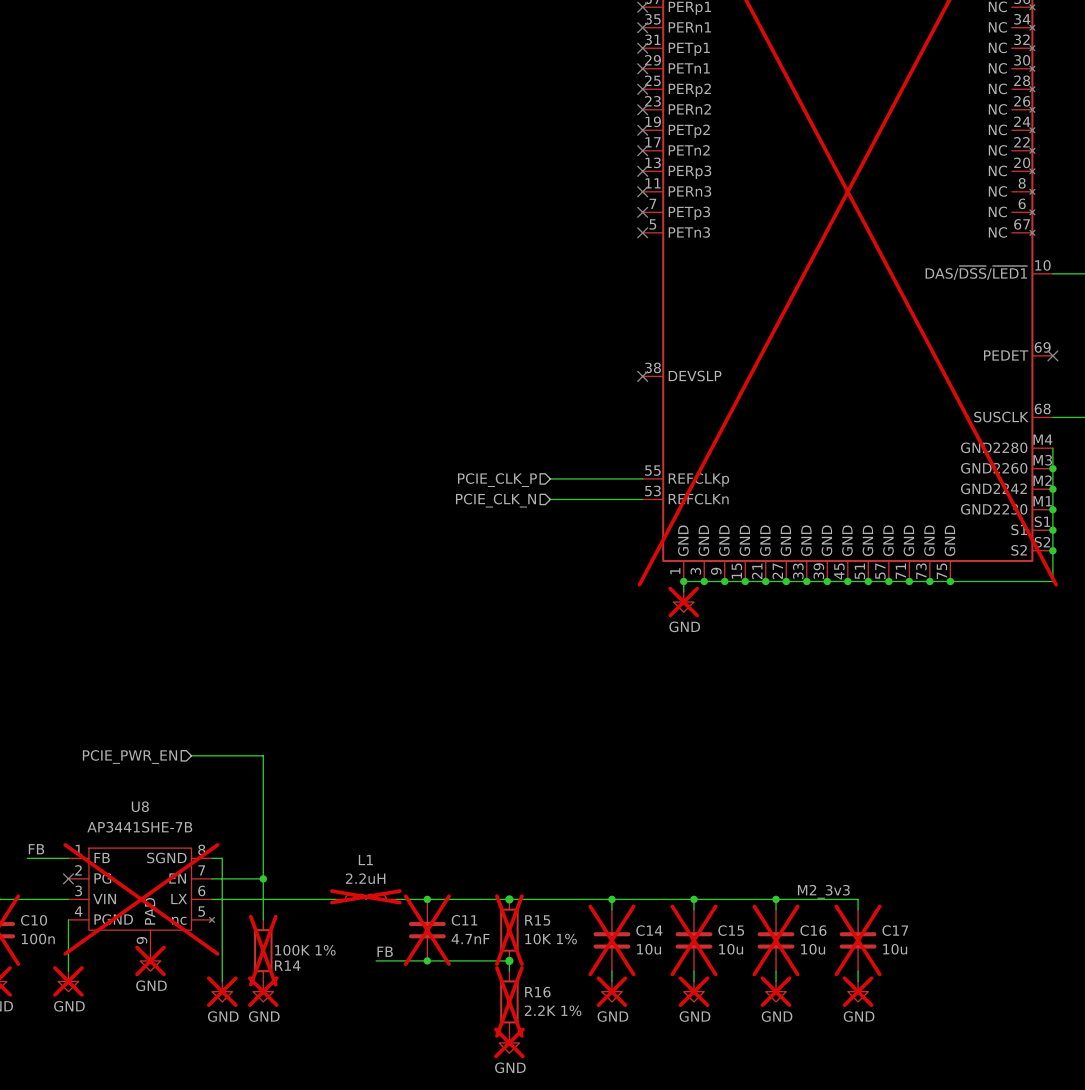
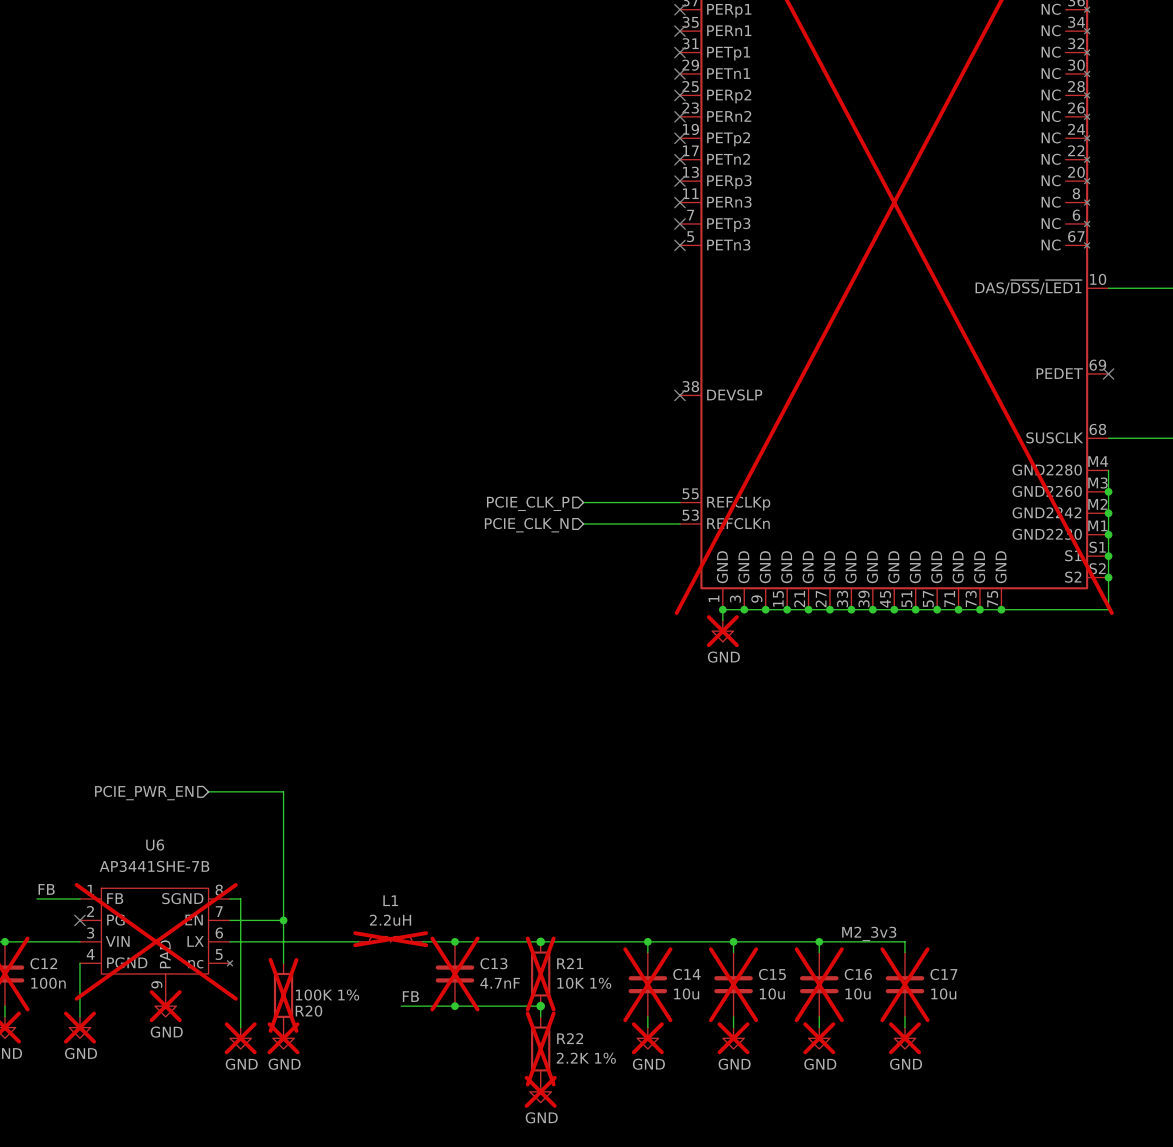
U8 name: U8 (140, 806) -> U6 (155, 845)
C10 name: C10 (34, 920) -> C12 (43, 963)
C11 name: C11 (464, 920) -> C13 (493, 963)
R15 name: R15 (537, 920) -> R21 (570, 963)
R14 name: R14 (287, 965) -> R20 (308, 1011)
R16 name: R16 (537, 992) -> R22 (570, 1038)

